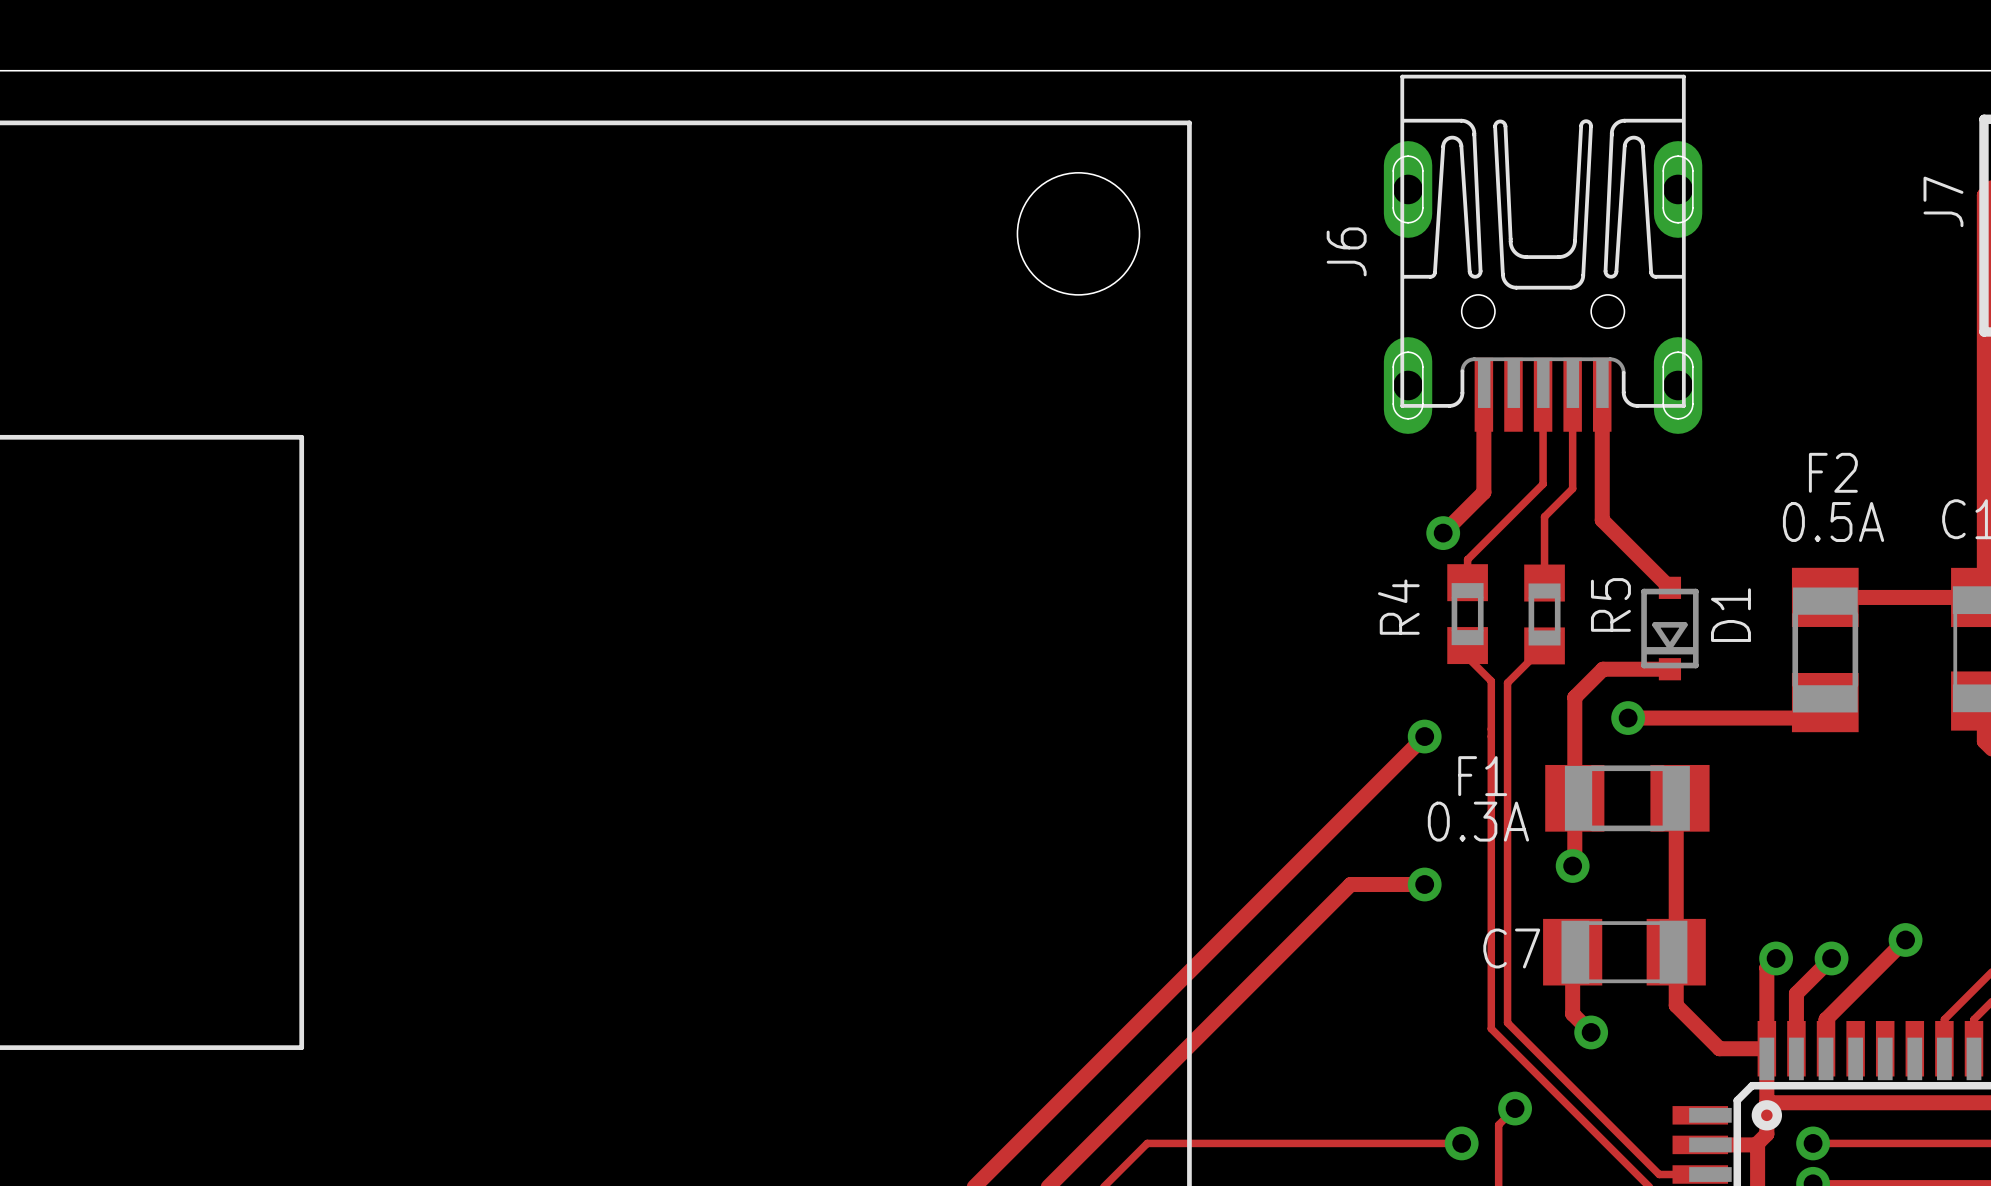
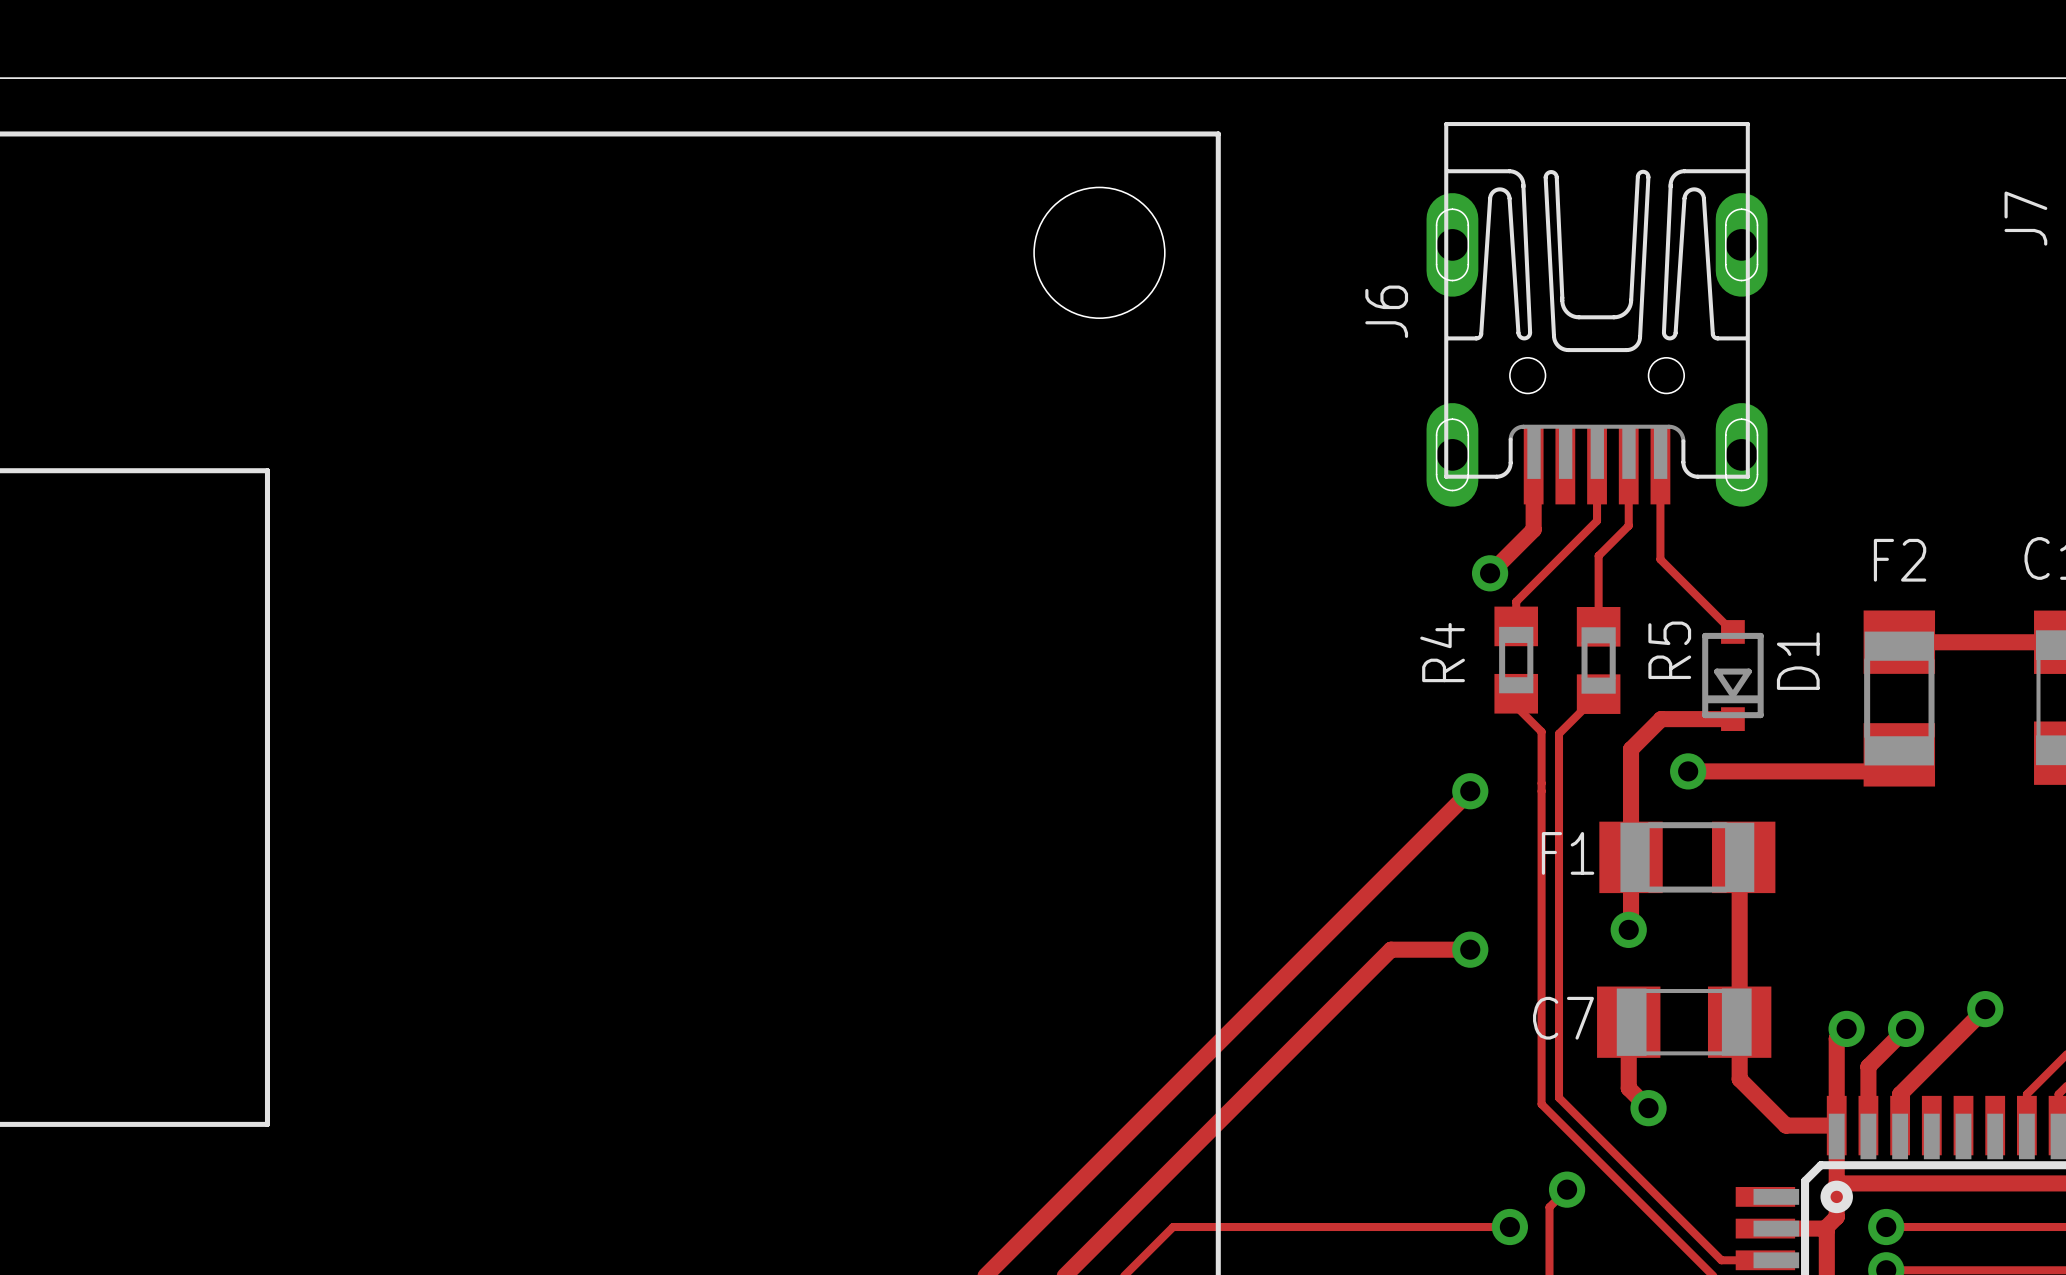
J6 position: (1543, 254) -> (1597, 314)
track width: thick (1602, 431) (1602, 520) (1669, 587) -> thin (1660, 464) (1660, 559) (1732, 631)
F2 name position: F2 (1833, 472) -> F2 (1900, 560)
text: 0.5A (1833, 522) -> none
F1 name position: F1 (1482, 776) -> F1 (1568, 853)
text: 0.3A (1478, 821) -> none

